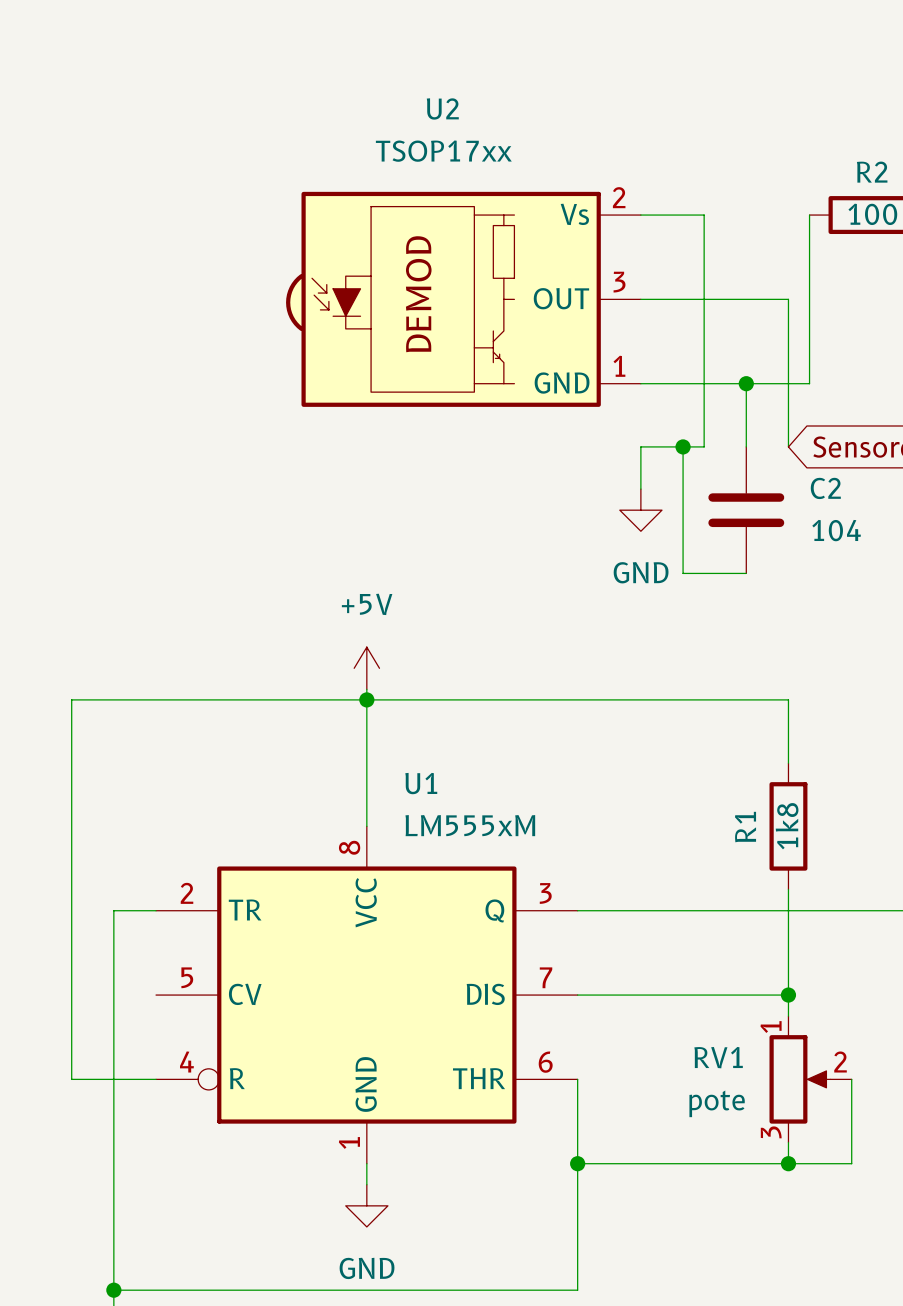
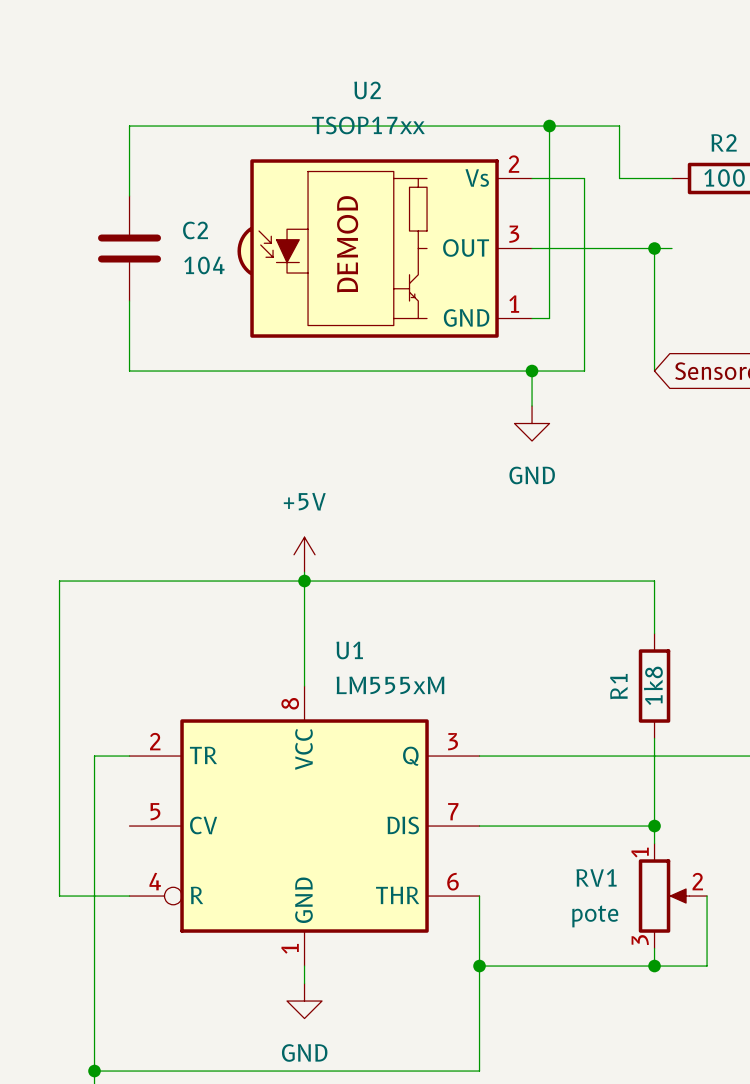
junction: none -> (549, 126)
wire: (809, 215) (809, 383) (661, 383) -> (549, 126) (549, 318)
wire: none -> (672, 178) (619, 178) (619, 126) (129, 126) (129, 196)
wire: none -> (654, 248) (672, 248)
junction: none -> (654, 248)
wire: none -> (129, 301) (129, 371) (532, 371)
wire: (746, 383) (746, 446) -> none
junction: (746, 383) -> none
wire: (683, 446) (683, 573) (746, 573) -> none
junction position: (683, 446) -> (532, 371)
C2 position: (746, 510) -> (129, 248)

